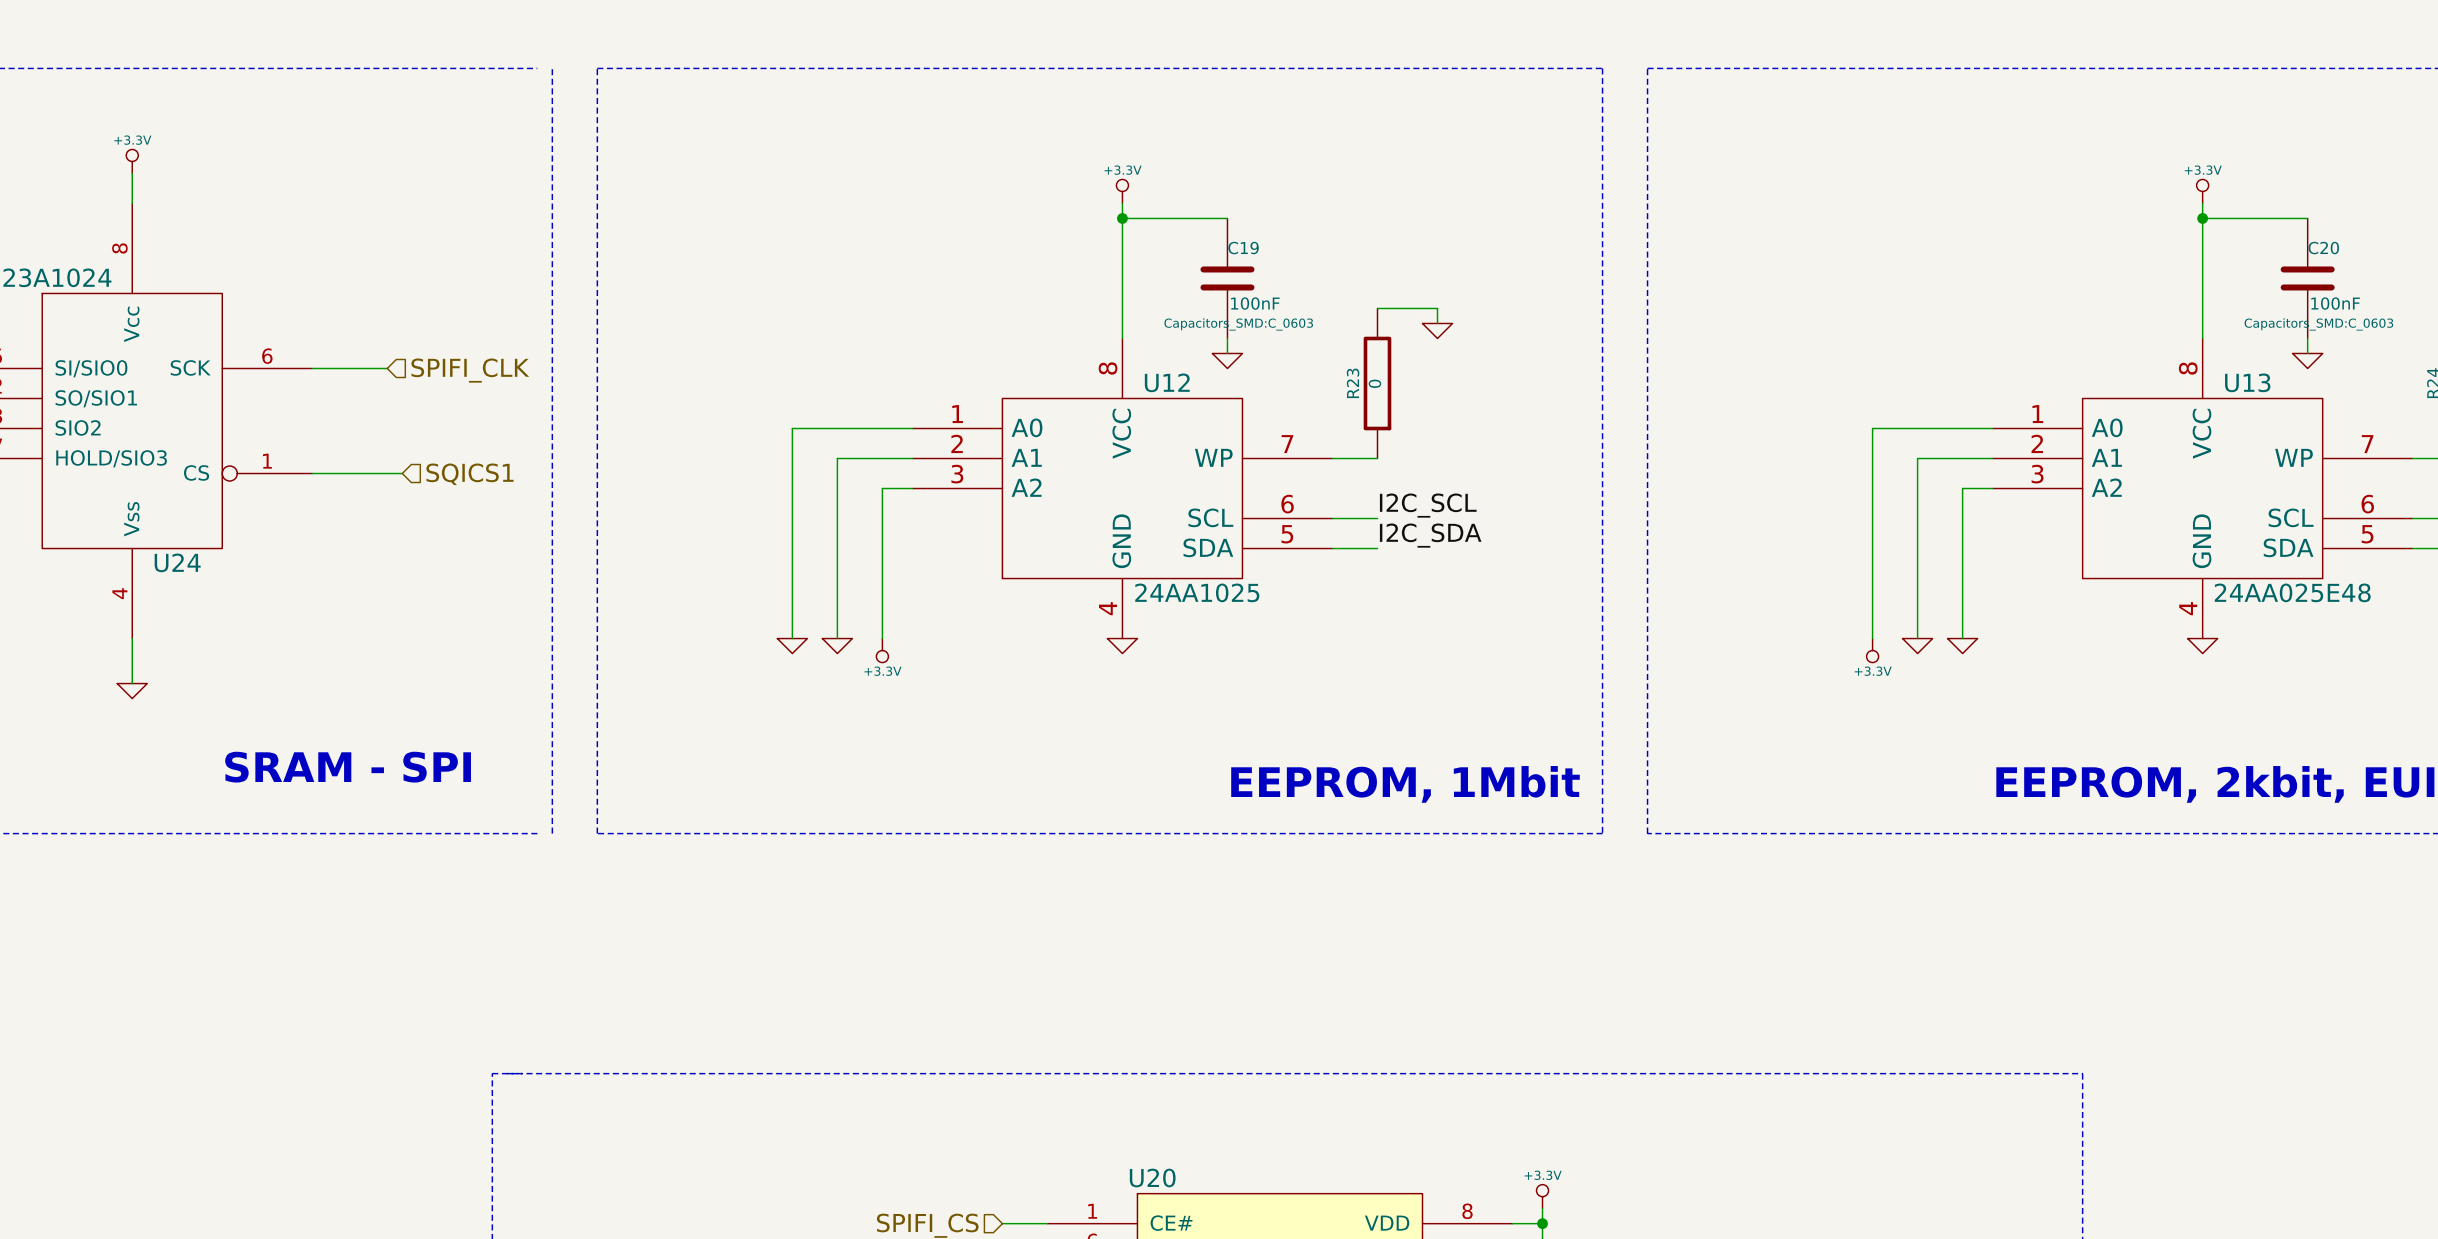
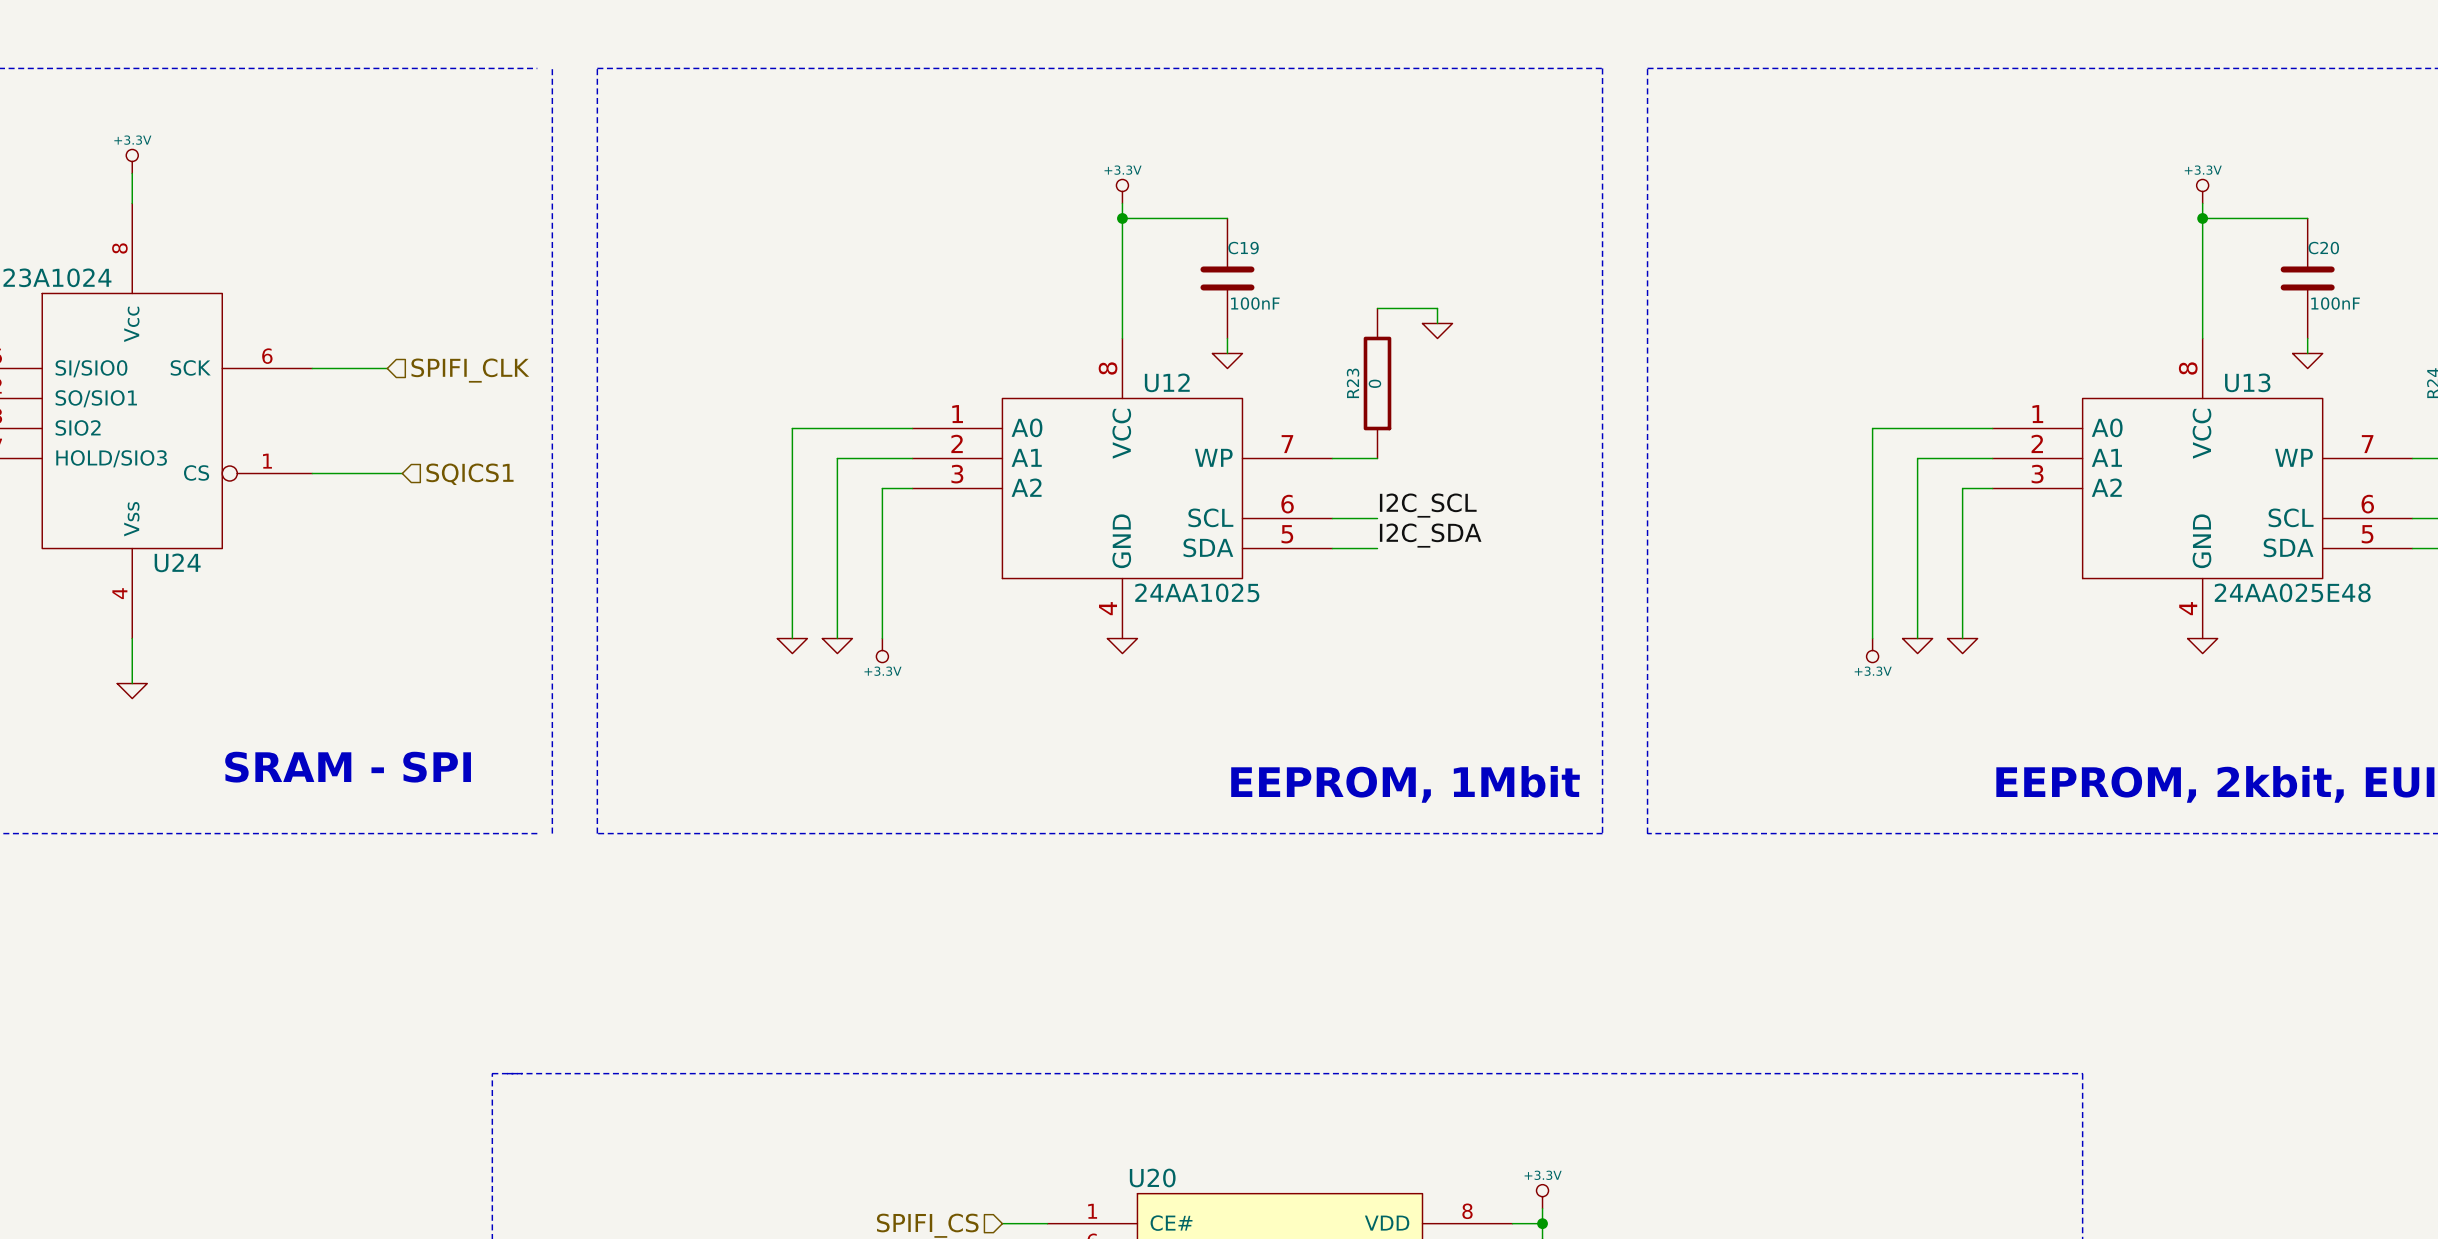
C19 text: Capacitors_SMD:C_0603 (1238, 324) -> none
C20 text: Capacitors_SMD:C_0603 (2318, 324) -> none

